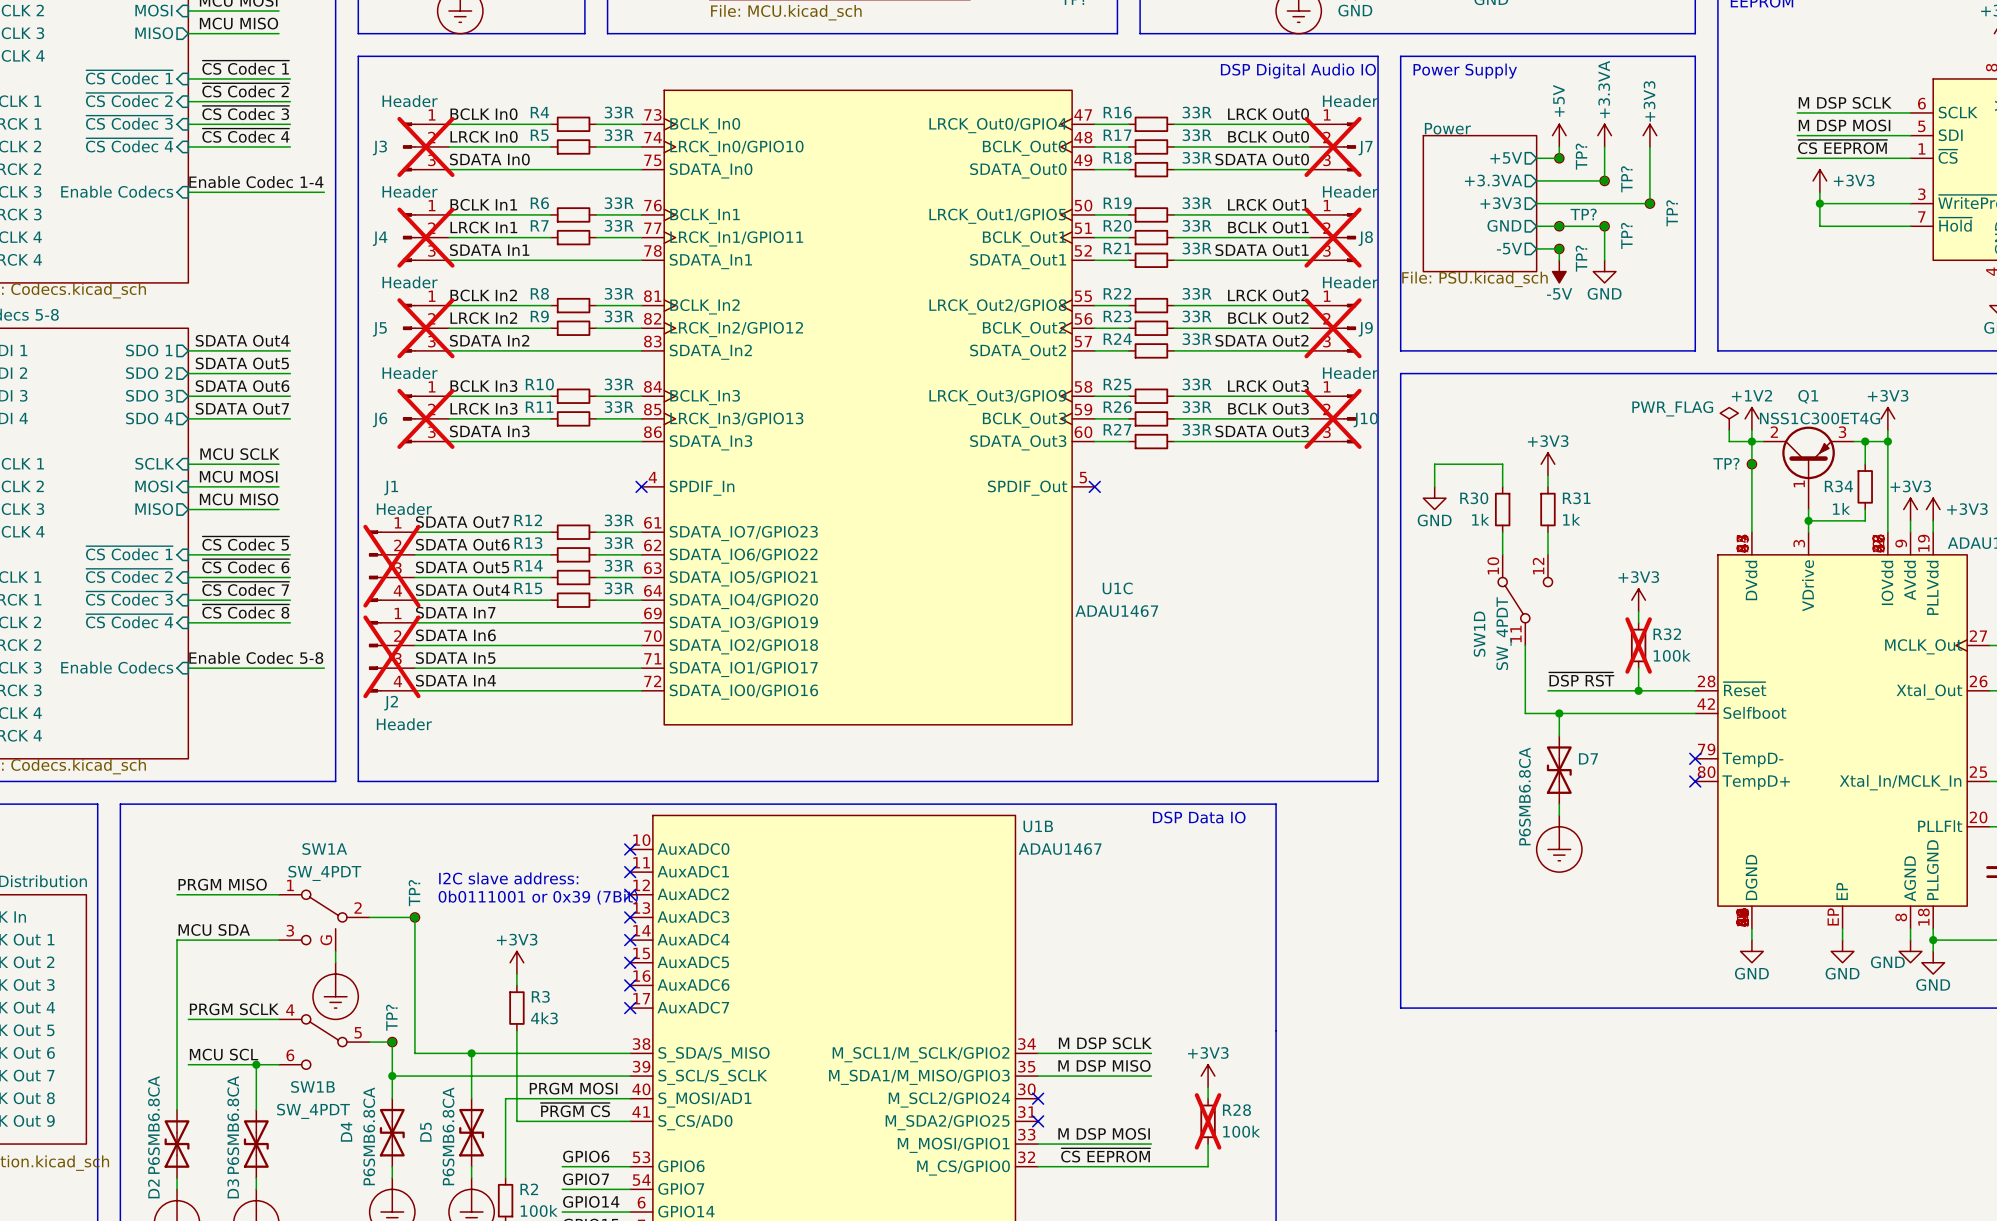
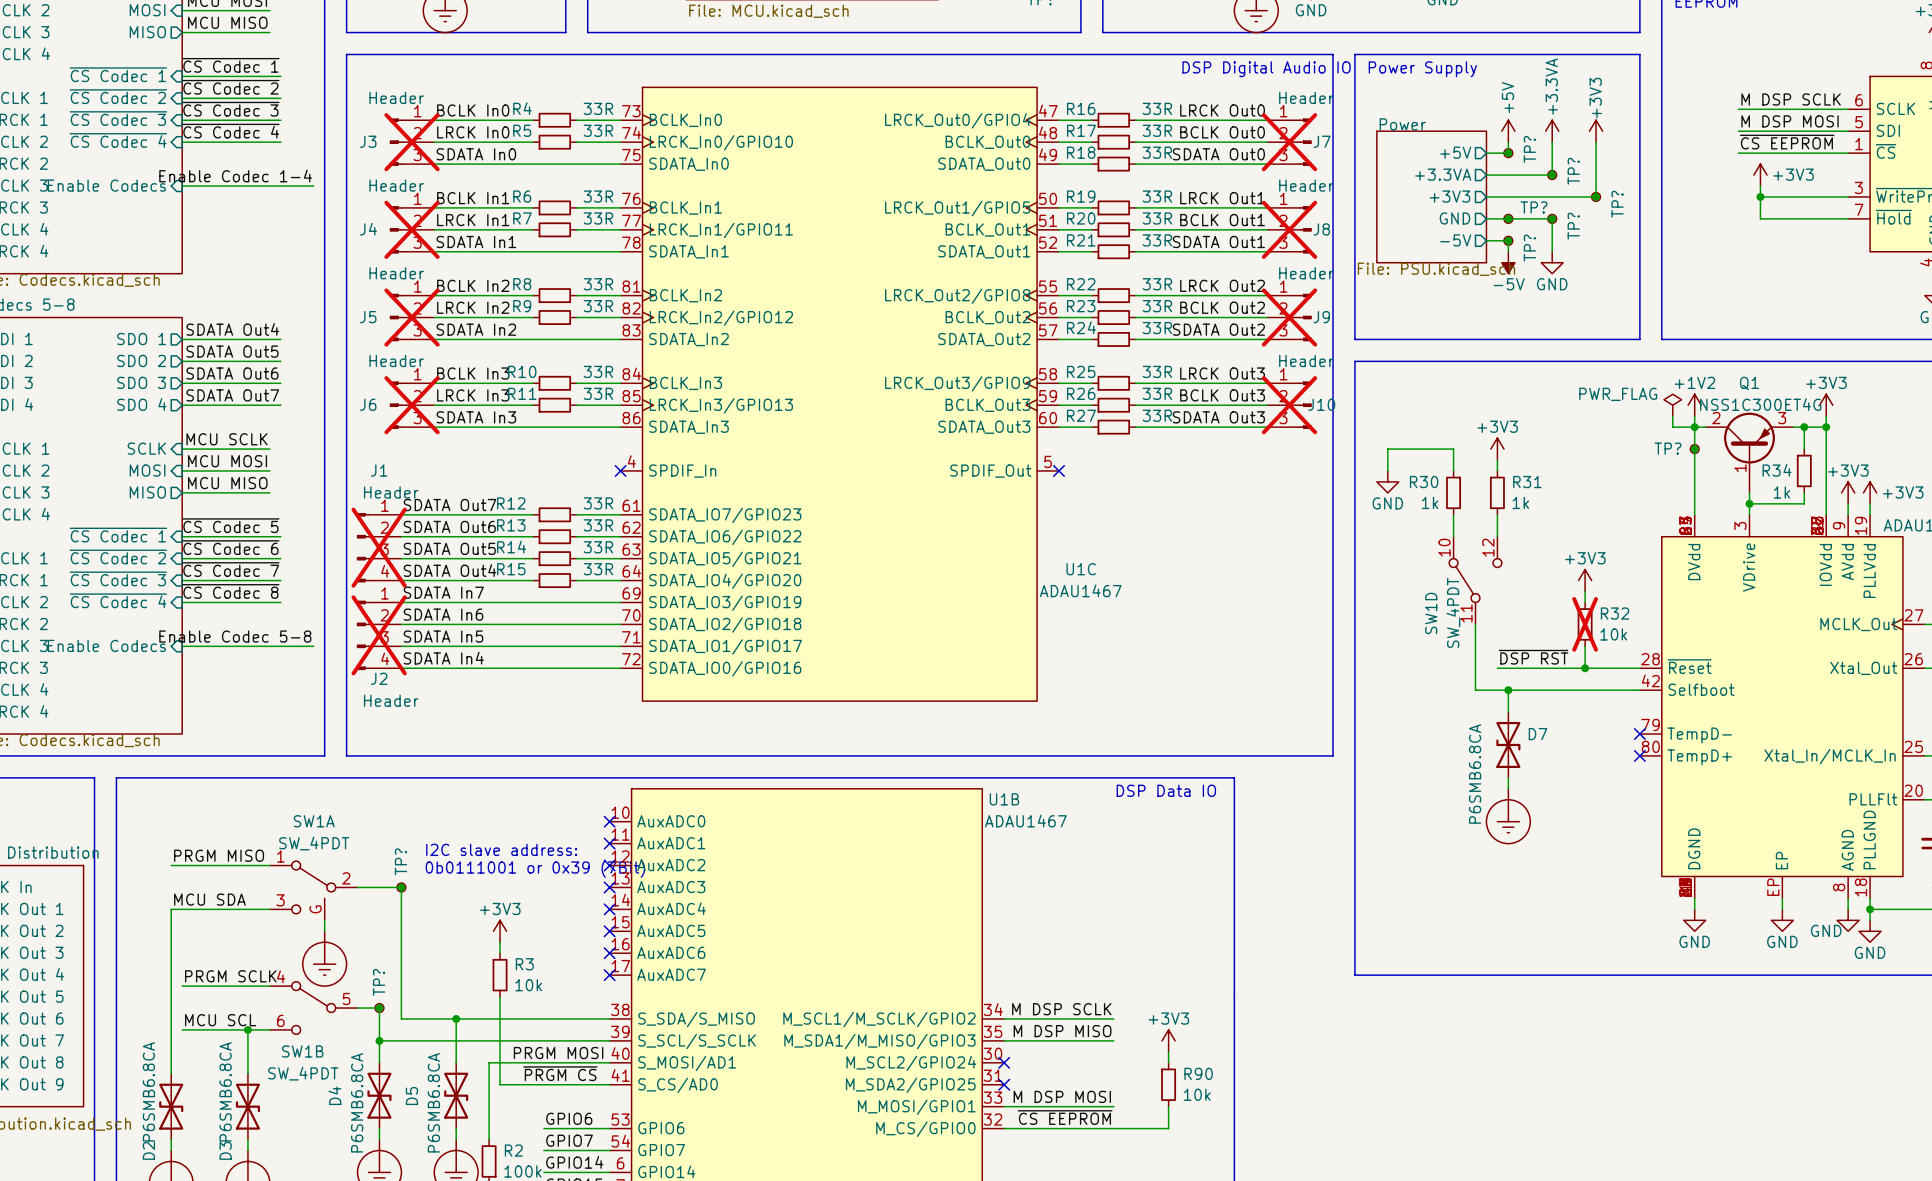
R32 value: 100k (1672, 655) -> 10k (1613, 634)
R3 value: 4k3 (544, 1018) -> 10k (528, 985)
R28 name: R28 (1236, 1110) -> R90 (1198, 1073)
R28 do-not-place cross: (1208, 1121) -> none
R28 value: 100k (1241, 1131) -> 10k (1197, 1094)

